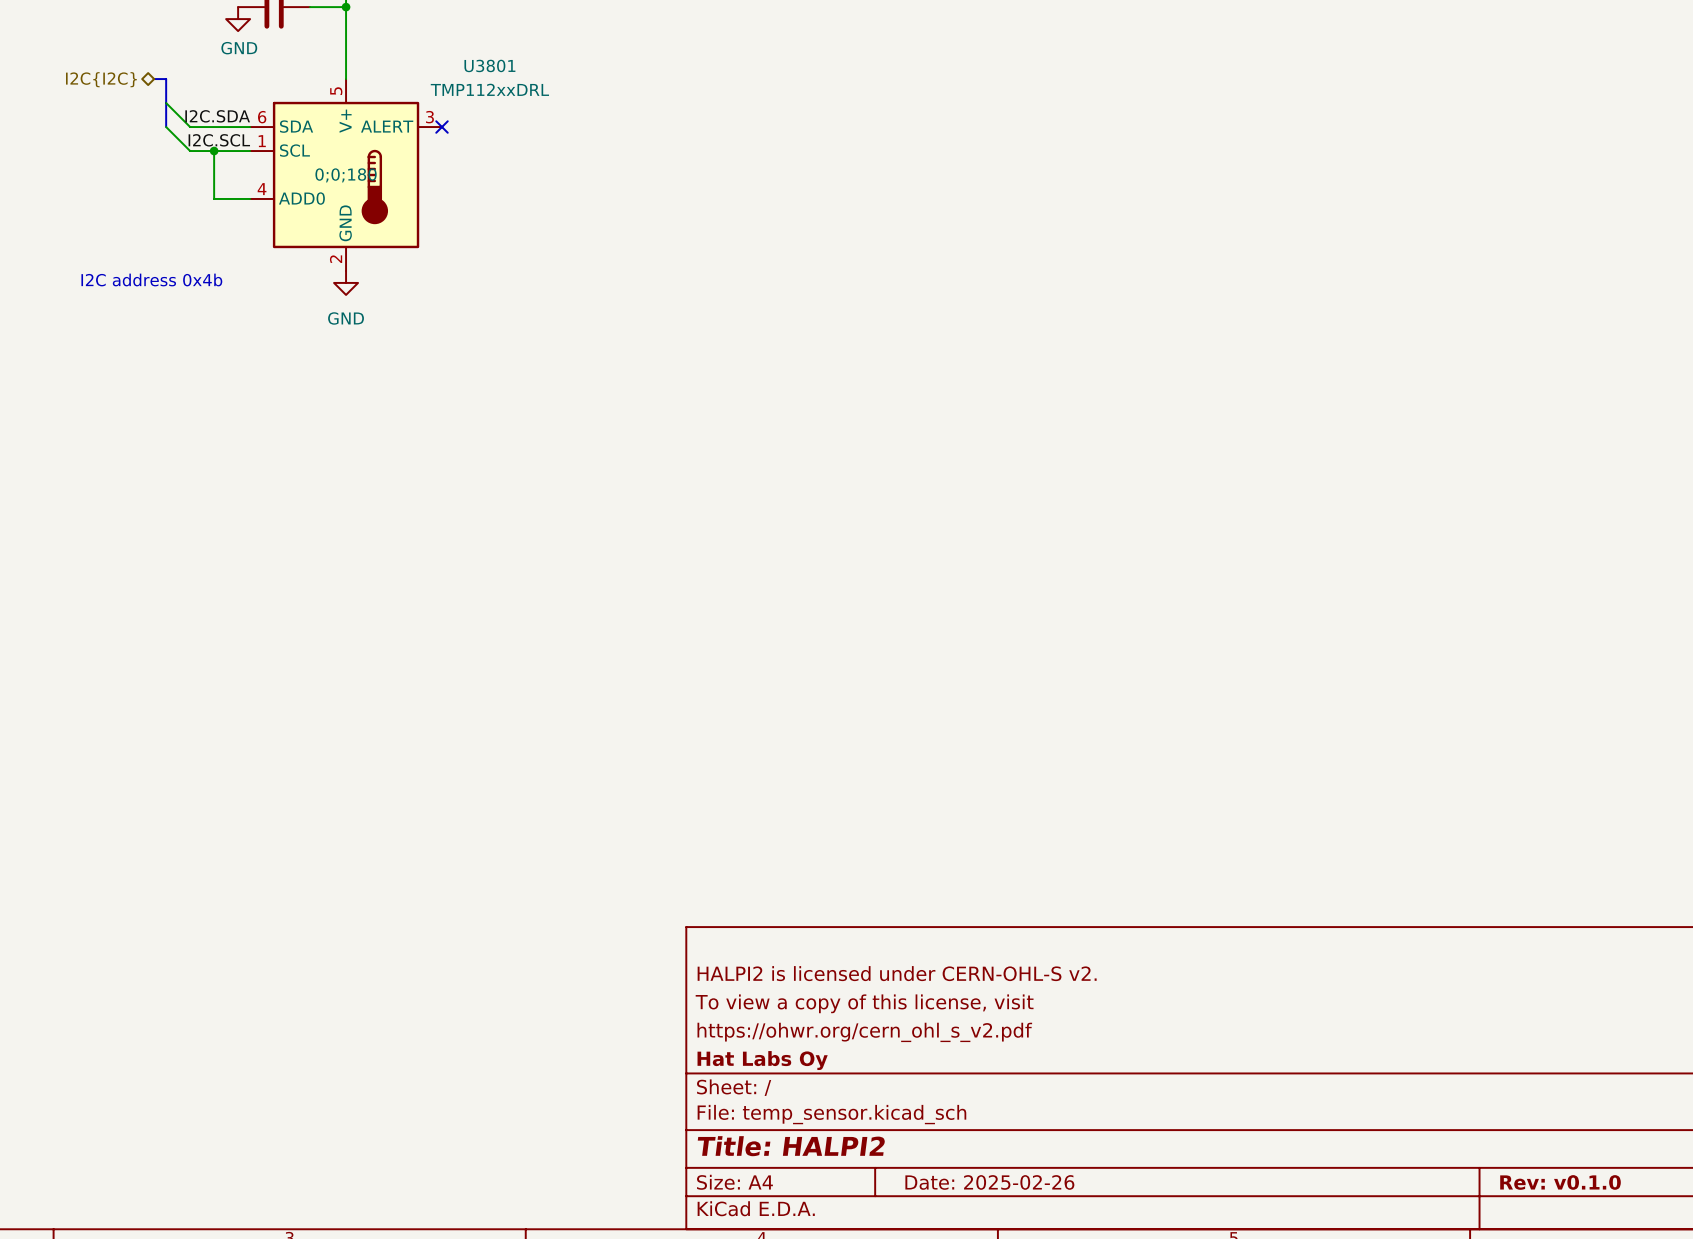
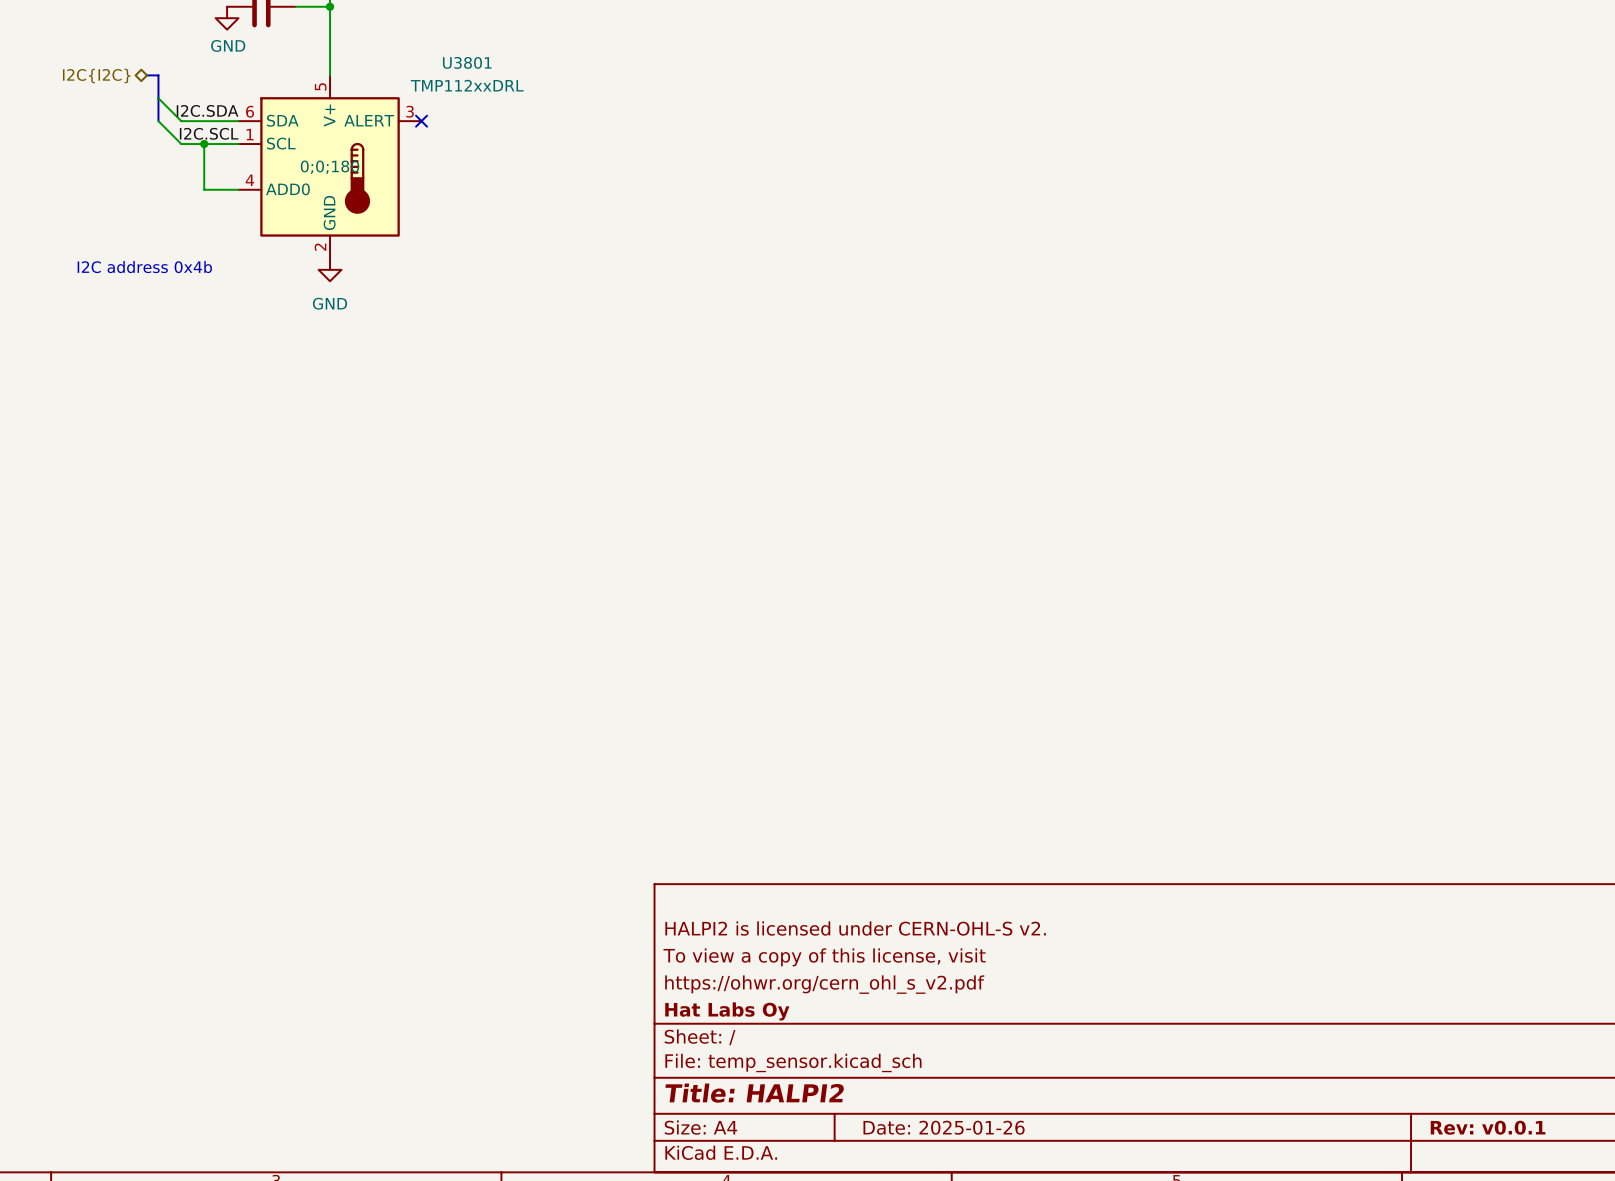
title block: Date: 2025-02-26 (989, 1182) -> Date: 2025-01-26 (944, 1127)
title block: Rev: v0.1.0 (1560, 1182) -> Rev: v0.0.1 (1488, 1127)

